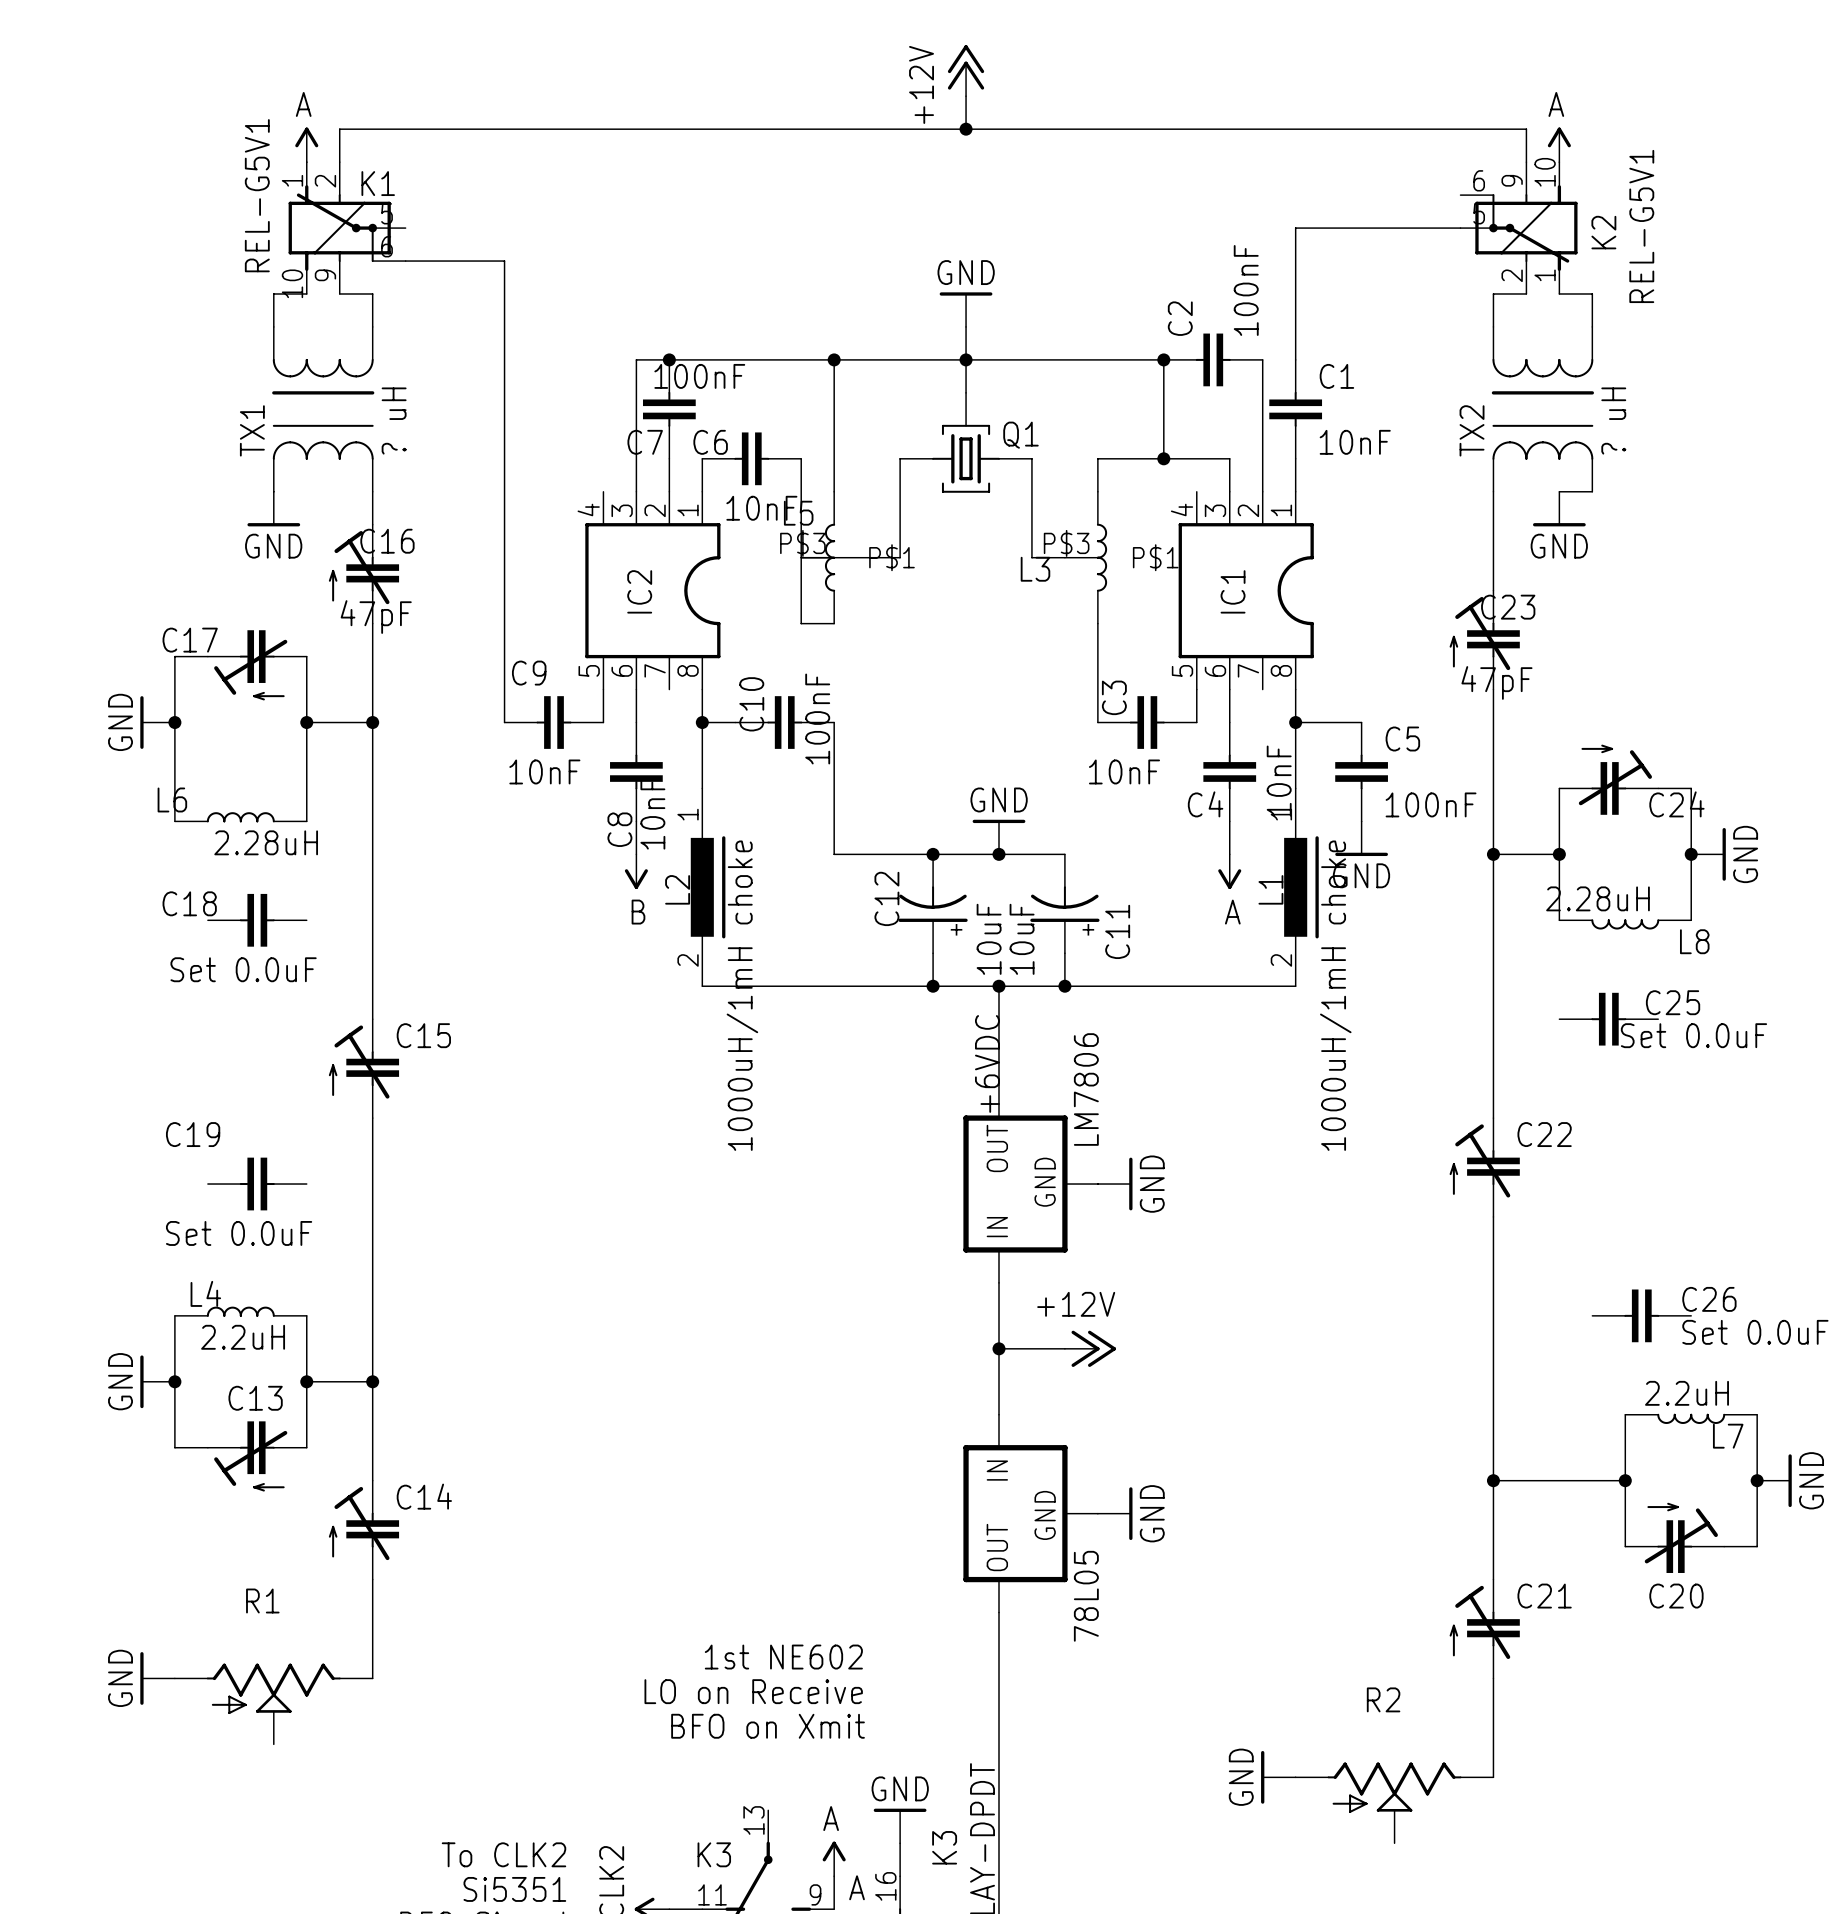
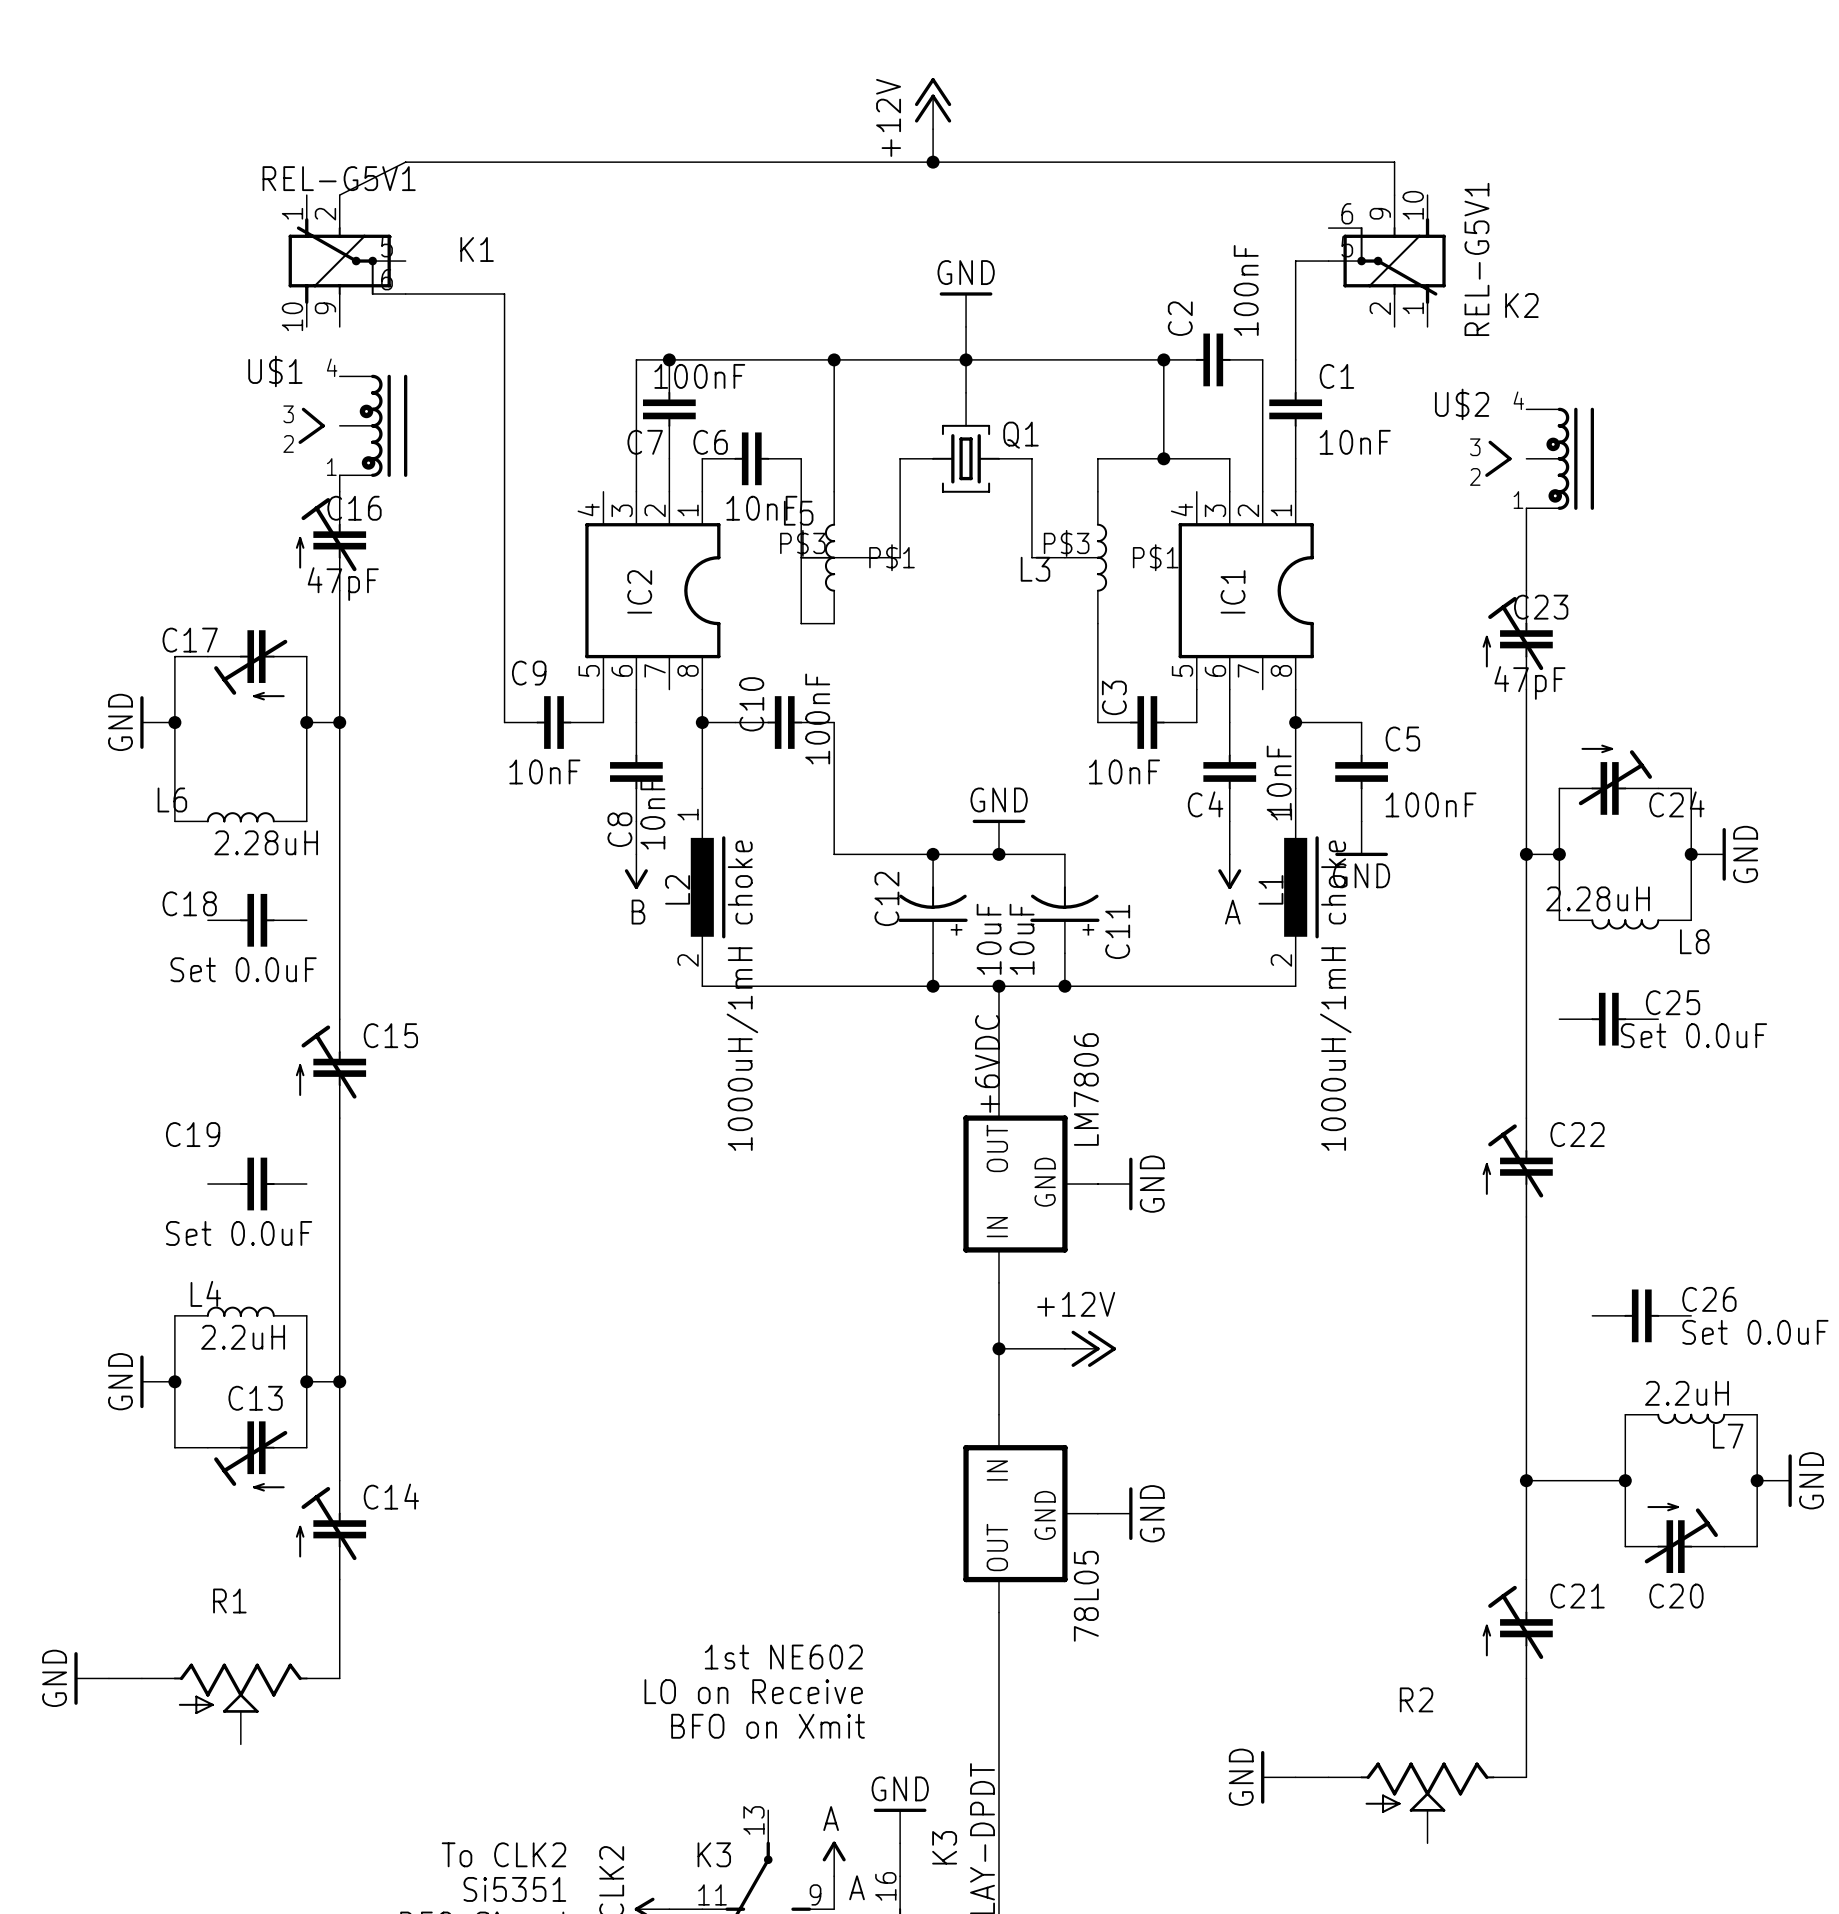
part position: (966, 70) -> (933, 103)
wire: (966, 96) (966, 129) -> (933, 129) (933, 162)
junction position: (966, 129) -> (933, 162)
part: A (306, 144) -> none
part: A (1559, 144) -> none
wire: (339, 162) (339, 129) (1526, 129) (1526, 162) -> none
K1 name position: K1 (378, 183) -> K1 (477, 249)
K1 value rotation: 0° (257, 195) -> 90° clockwise (339, 178)
wire: none -> (339, 195) (405, 162) (1394, 162) (1394, 195)
K2 value position: REL-G5V1 (1641, 226) -> REL-G5V1 (1476, 259)
K1 position: (339, 228) -> (339, 261)
part position: (351, 228) -> (351, 261)
wire: (1460, 228) (1295, 228) (1295, 261) -> (1328, 261) (1295, 261)
part position: (1514, 228) -> (1383, 261)
K2 position: (1526, 228) -> (1394, 261)
K2 name rotation: 0° (1603, 232) -> 90° clockwise (1521, 305)
K2 name position: K2 (1603, 232) -> K2 (1521, 305)
wire: (405, 261) (504, 261) (504, 293) -> (405, 293) (504, 293)
wire: (306, 293) (273, 293) (273, 326) -> none
wire: (339, 293) (372, 293) (372, 326) -> none
wire: (1526, 293) (1493, 293) (1493, 326) -> none
wire: (1559, 293) (1592, 293) (1592, 326) -> none
TX1: ? uH (263, 409) -> none
TX2: ? uH (1483, 409) -> none
U$1: none -> (352, 425)
U$2: none -> (1539, 458)
wire: none -> (339, 475) (339, 491)
wire: (372, 491) (372, 524) -> none
wire: (1493, 491) (1493, 590) -> none
wire: (1559, 491) (1592, 491) -> none
wire: none -> (1526, 508) (1526, 590)
power symbol: GND (273, 509) -> none
power symbol: GND (1559, 509) -> none
C16 position: (363, 574) -> (330, 541)
wire: none -> (339, 590) (339, 1019)
wire: (372, 623) (372, 1019) -> none
C23 position: (1484, 640) -> (1517, 640)
wire: (1493, 689) (1493, 1118) -> (1526, 689) (1526, 1118)
wire: (339, 722) (372, 722) -> none
junction position: (372, 722) -> (339, 722)
wire: (1493, 854) (1526, 854) -> none
junction position: (1493, 854) -> (1526, 854)
C15 position: (363, 1068) -> (330, 1068)
wire: (372, 1118) (372, 1480) -> (339, 1118) (339, 1480)
C22 position: (1484, 1167) -> (1517, 1167)
wire: (1493, 1216) (1493, 1579) -> (1526, 1216) (1526, 1579)
wire: (339, 1381) (372, 1381) -> none
junction position: (372, 1381) -> (339, 1381)
wire: (1493, 1480) (1526, 1480) -> none
junction position: (1493, 1480) -> (1526, 1480)
C14 position: (363, 1530) -> (330, 1530)
wire: (372, 1579) (372, 1678) -> (339, 1579) (339, 1678)
C21 position: (1484, 1629) -> (1517, 1629)
wire: none -> (108, 1678) (141, 1678)
power symbol position: GND (157, 1678) -> GND (91, 1678)
wire: (1493, 1678) (1493, 1777) -> (1526, 1678) (1526, 1777)
R1 position: (273, 1704) -> (240, 1704)
R2 position: (1394, 1802) -> (1427, 1802)

